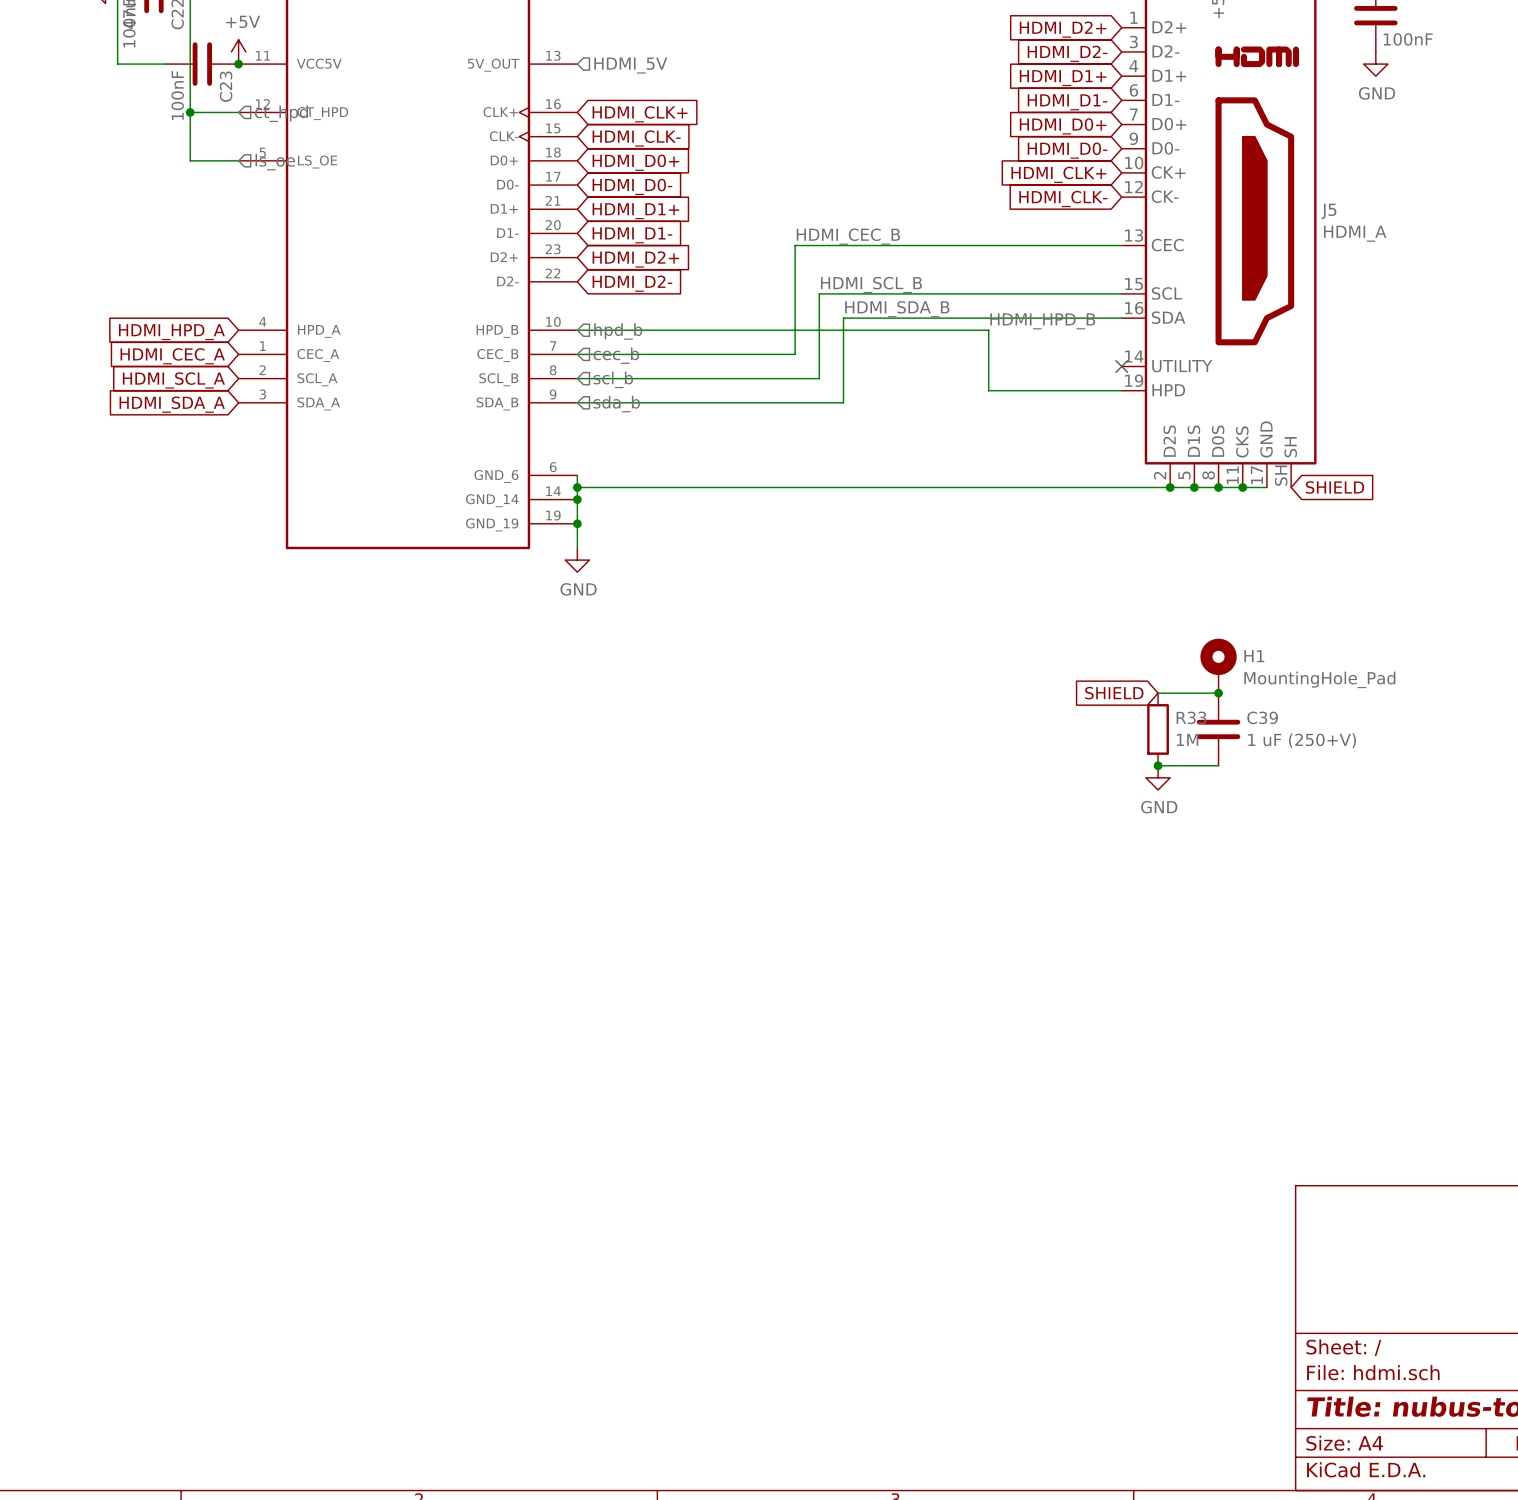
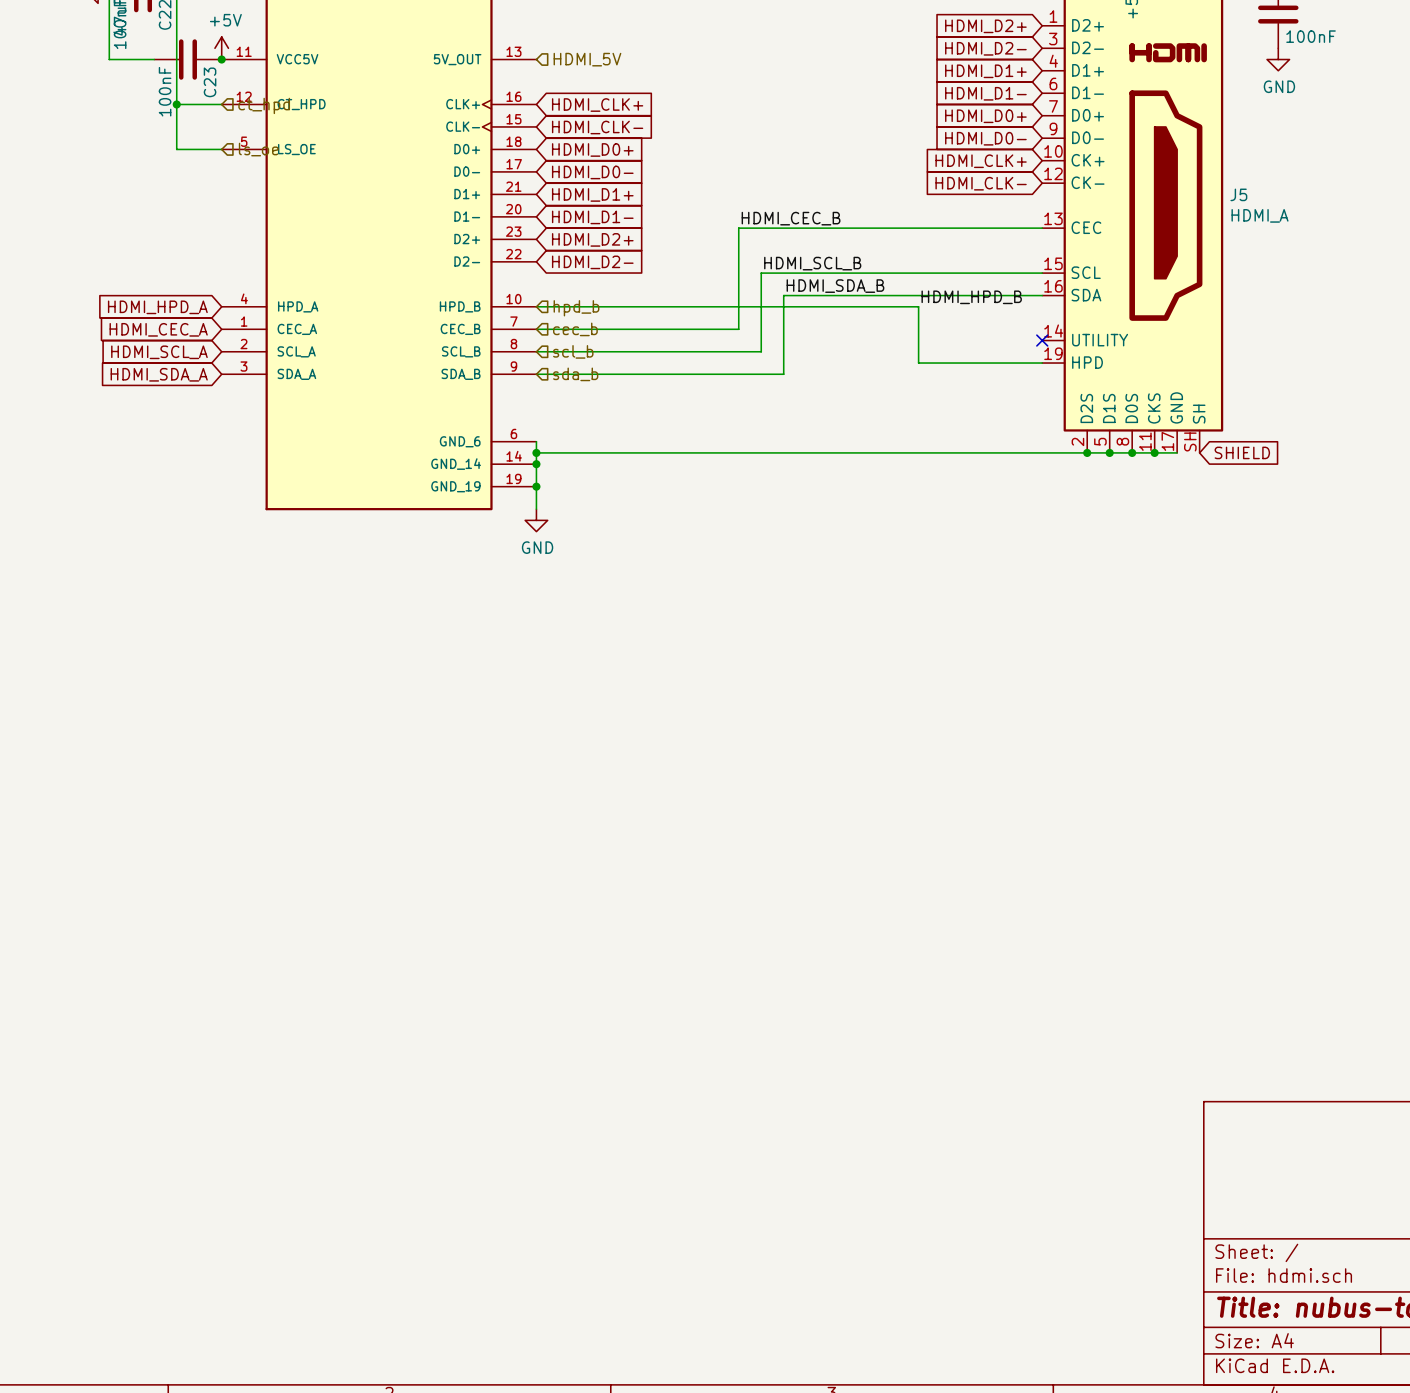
H1: MountingHole_Pad (1218, 665) -> none
global label: SHIELD (1114, 693) -> none
wire: (1158, 693) (1218, 693) -> none
junction: (1218, 693) -> none
R33: 1M (1158, 729) -> none
C39: 1 uF (250+V) (1218, 729) -> none
wire: (1158, 765) (1218, 765) -> none
junction: (1158, 765) -> none
power symbol: GND (1158, 777) -> none

